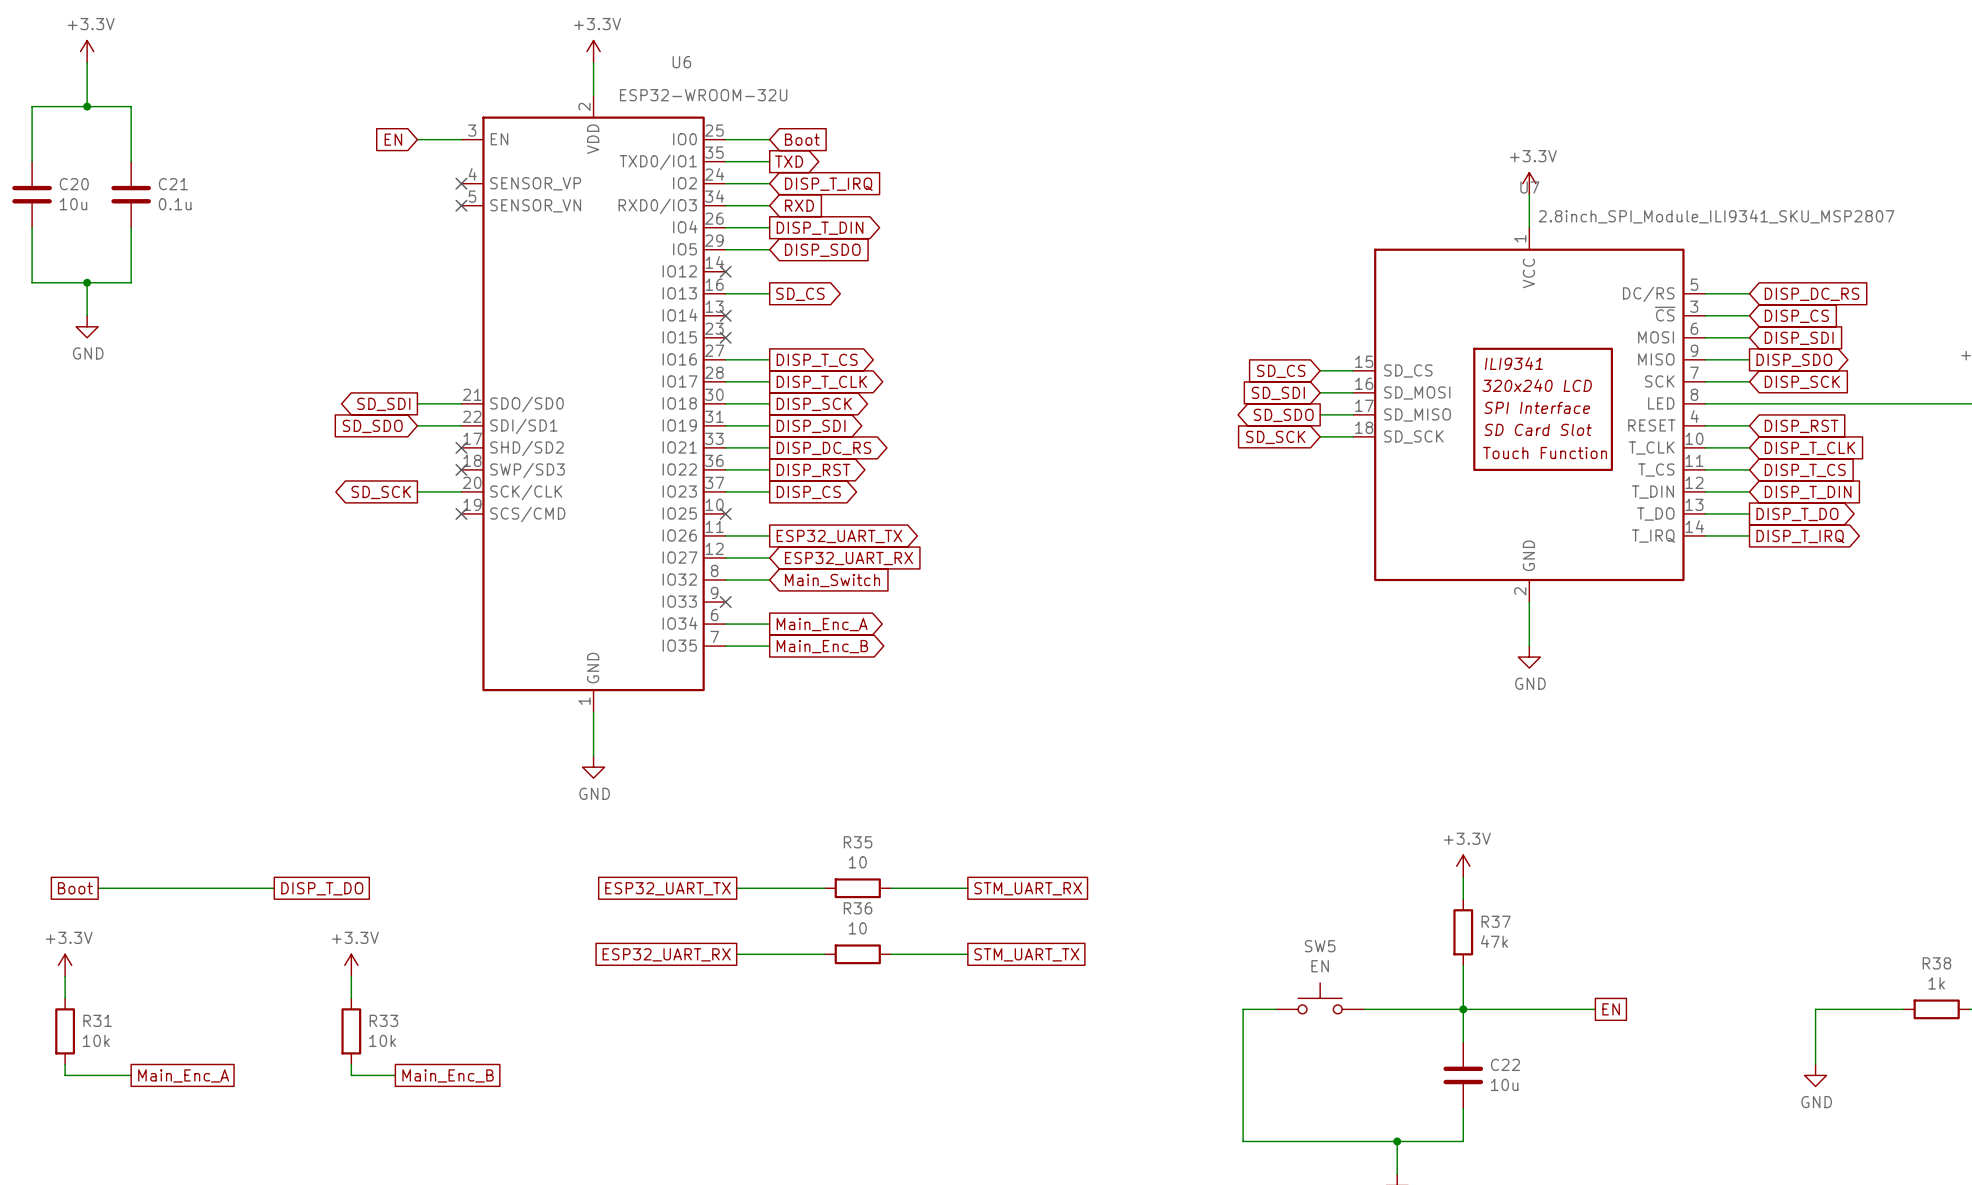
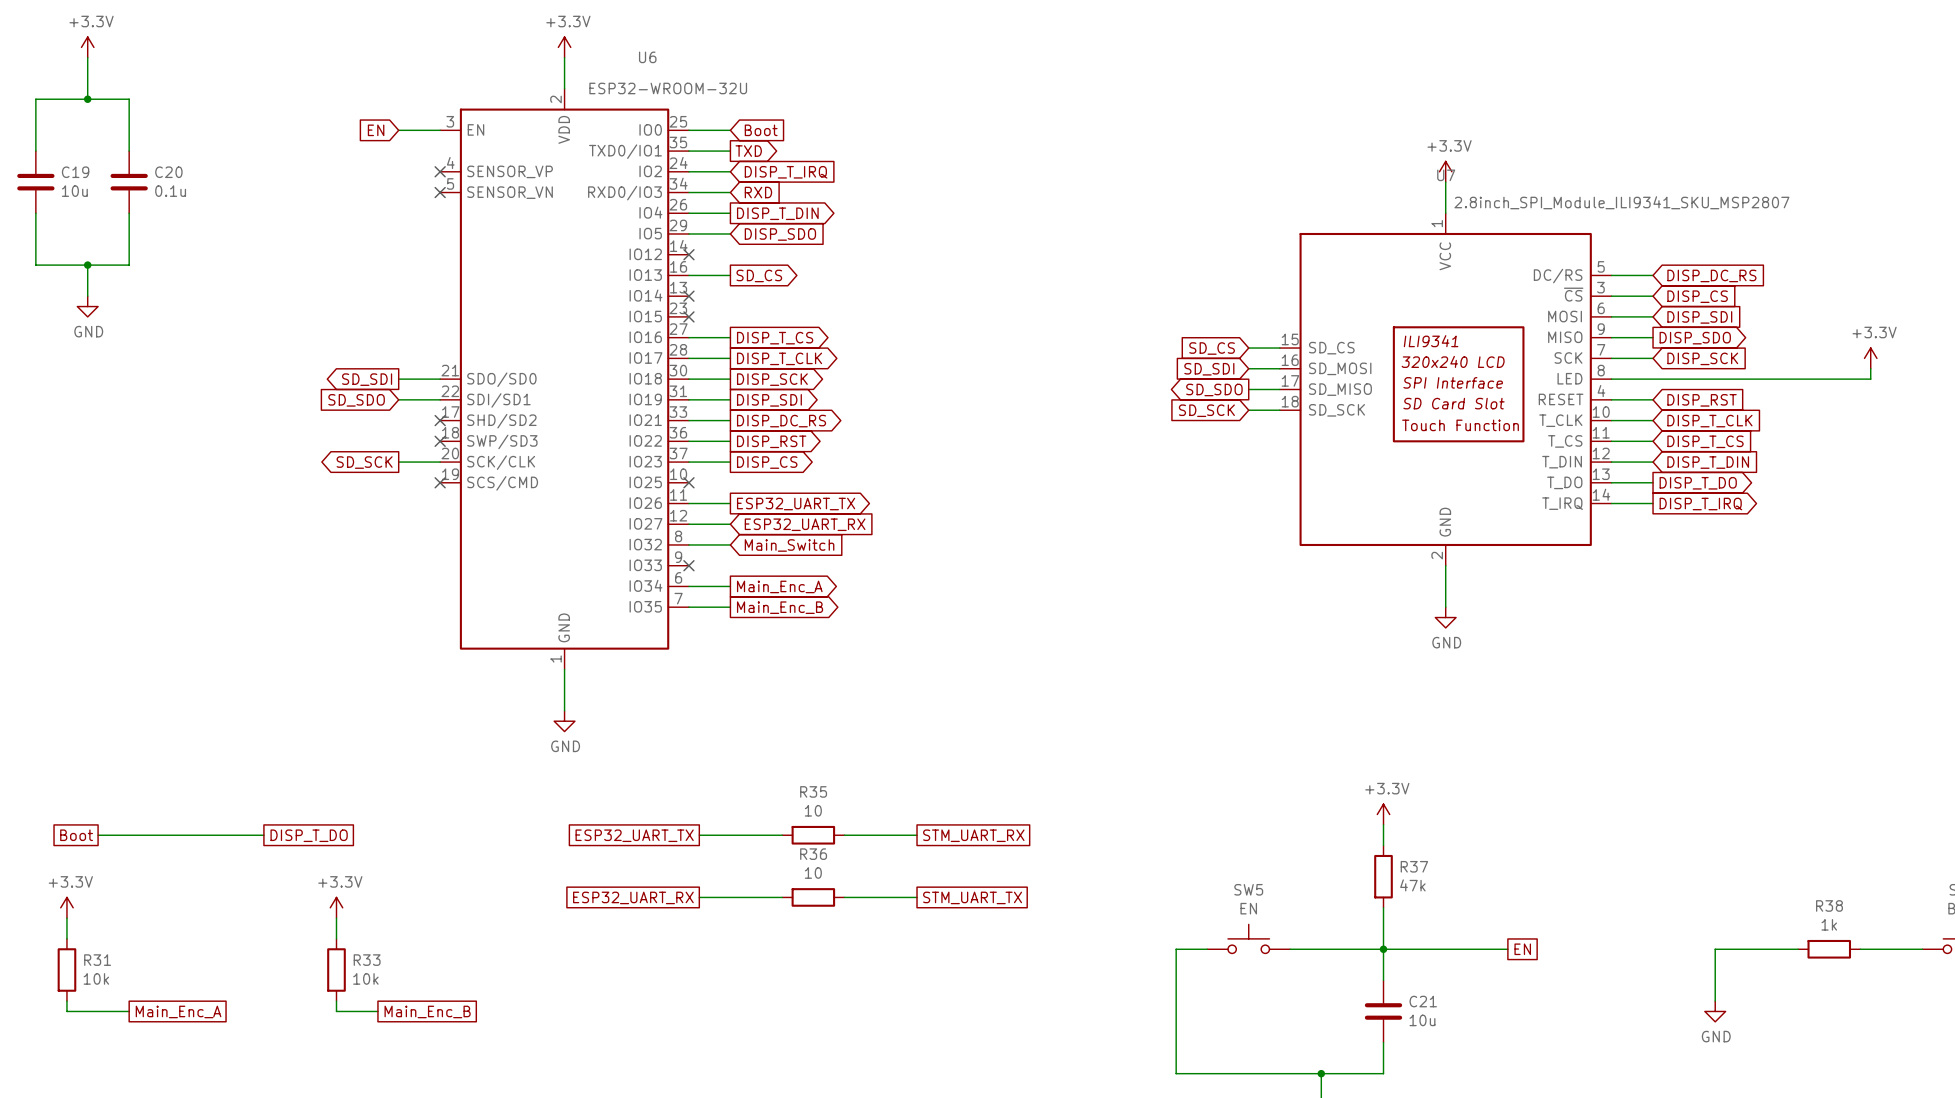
C20 name: C20 (74, 184) -> C19 (75, 172)
C21 name: C21 (173, 184) -> C20 (168, 172)
C22 name: C22 (1505, 1064) -> C21 (1423, 1001)

